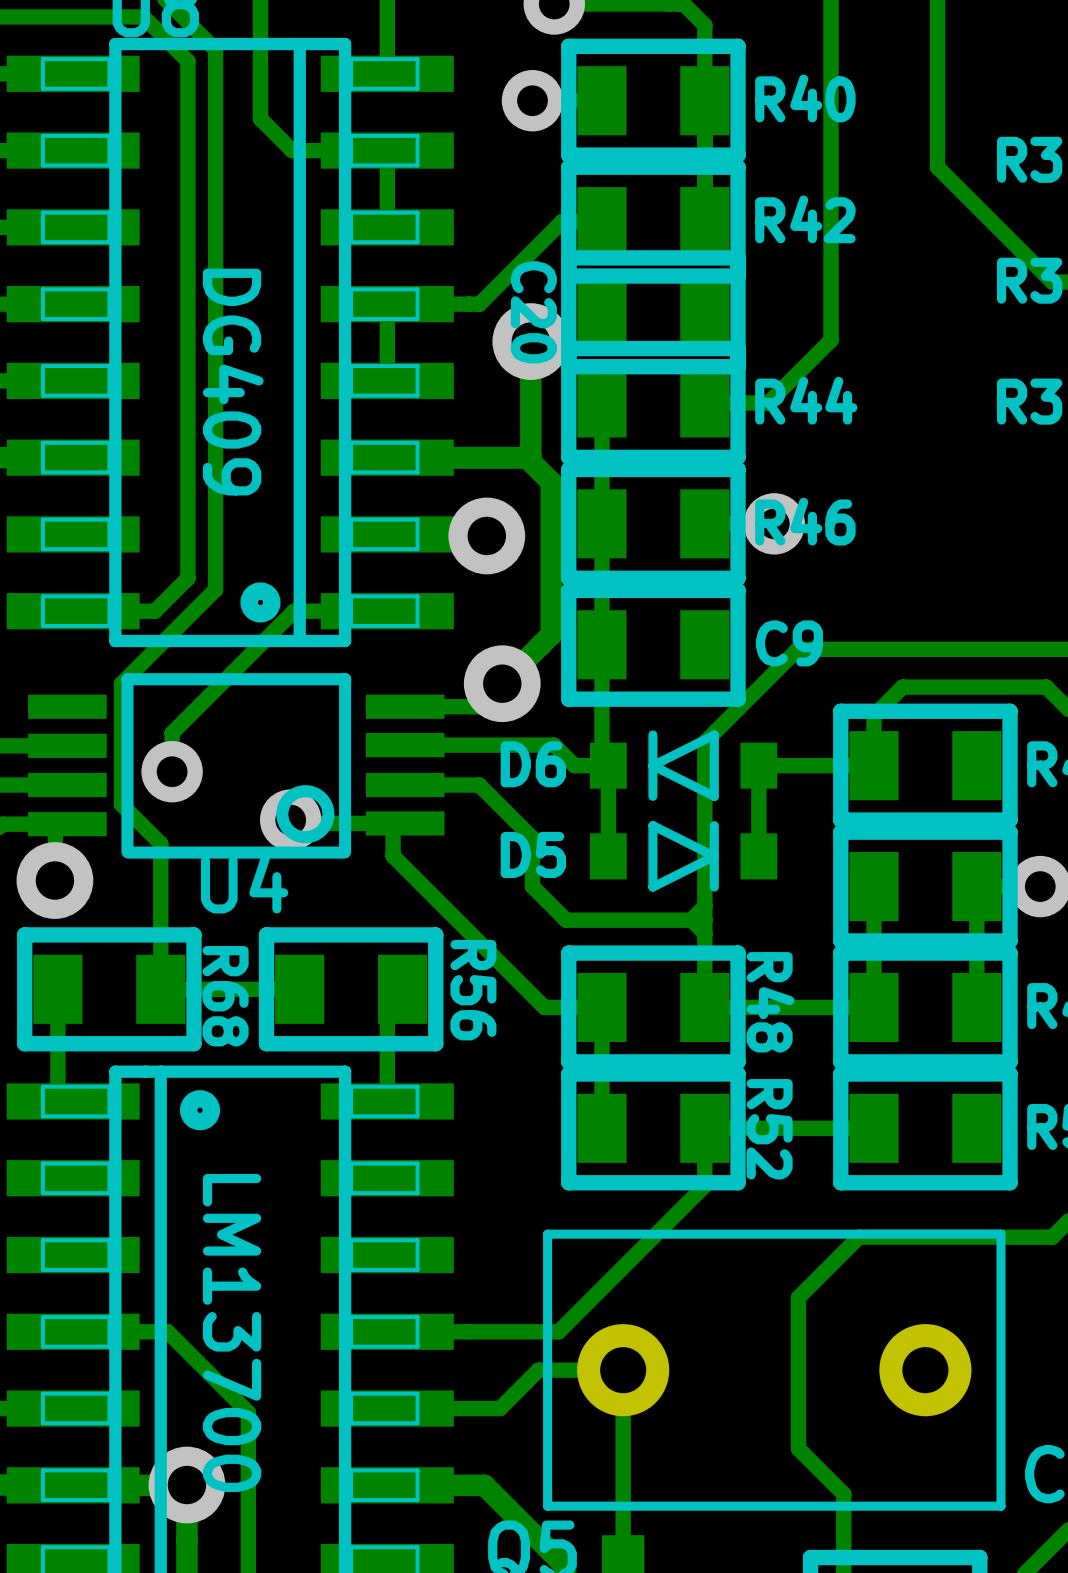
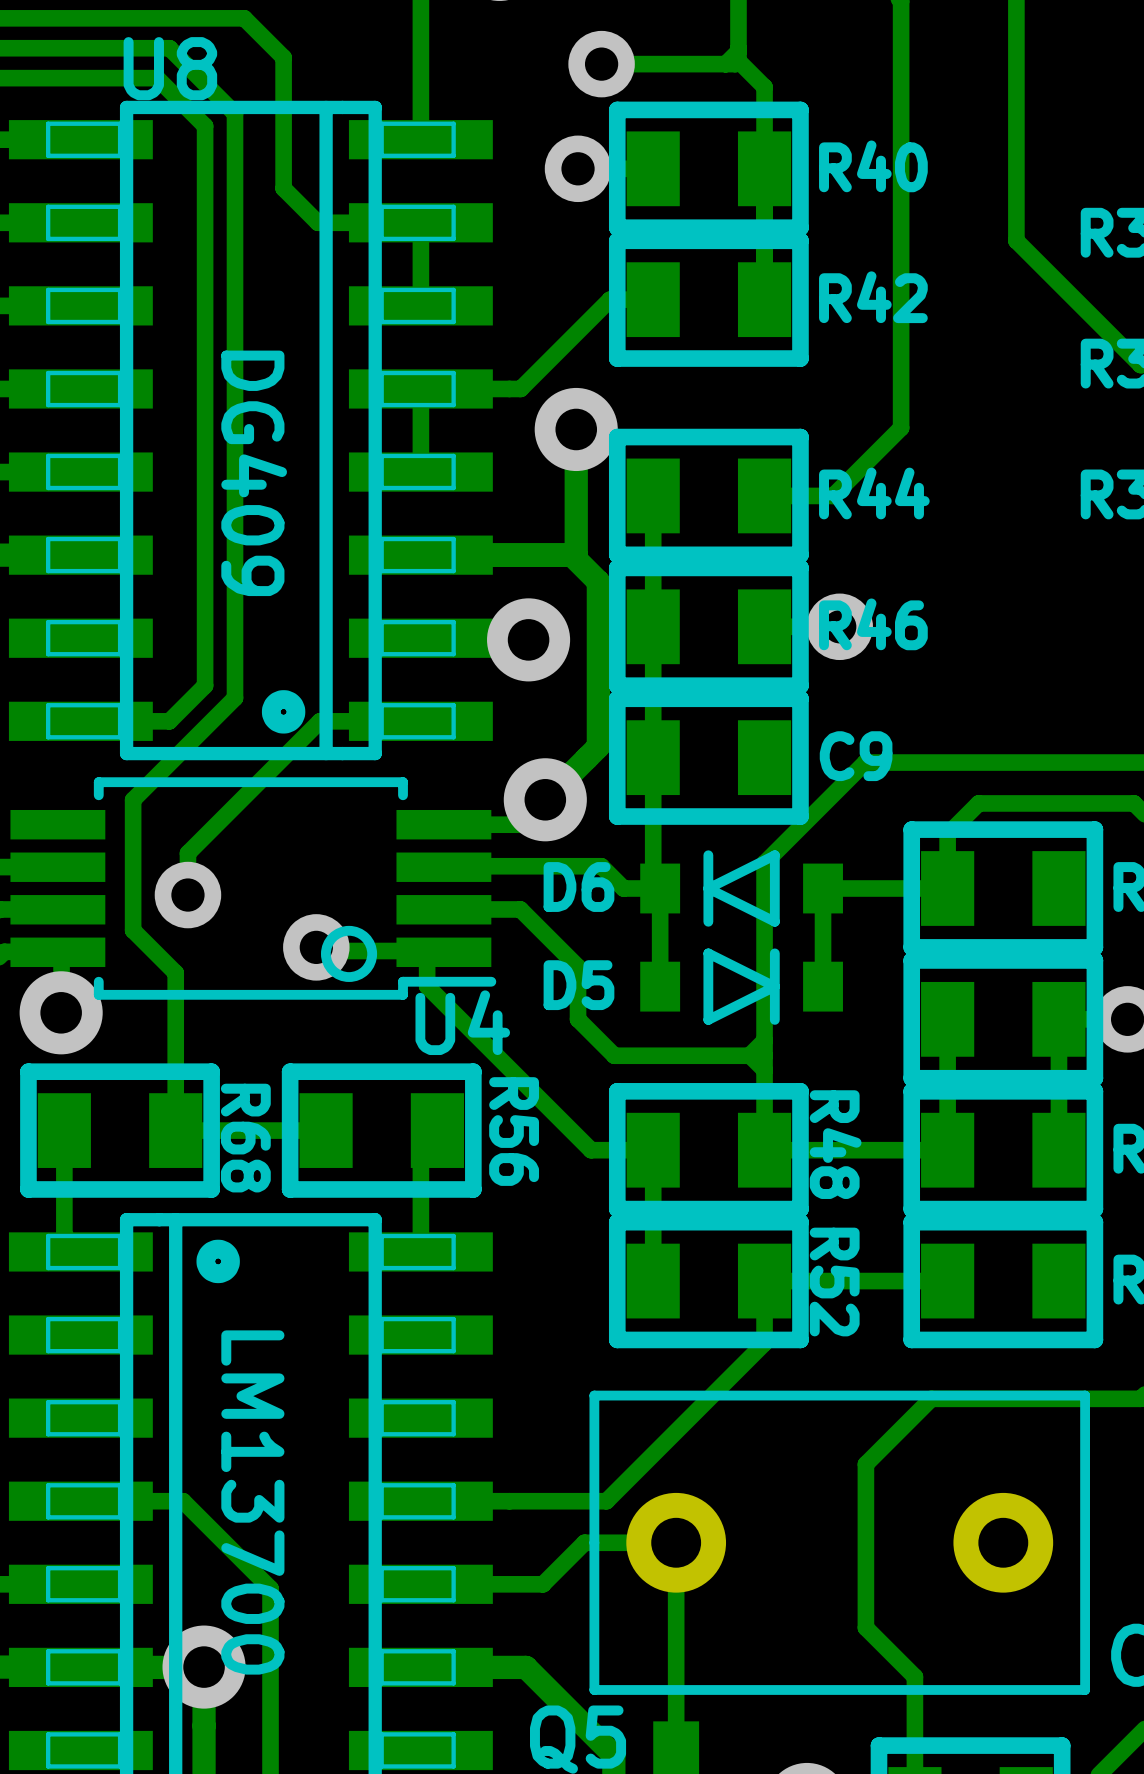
C20: (653, 312) -> none
U4 footprint: [28, 673, 445, 859] -> [10, 777, 497, 1000]
U4 name position: U4 (244, 883) -> U4 (462, 1022)

